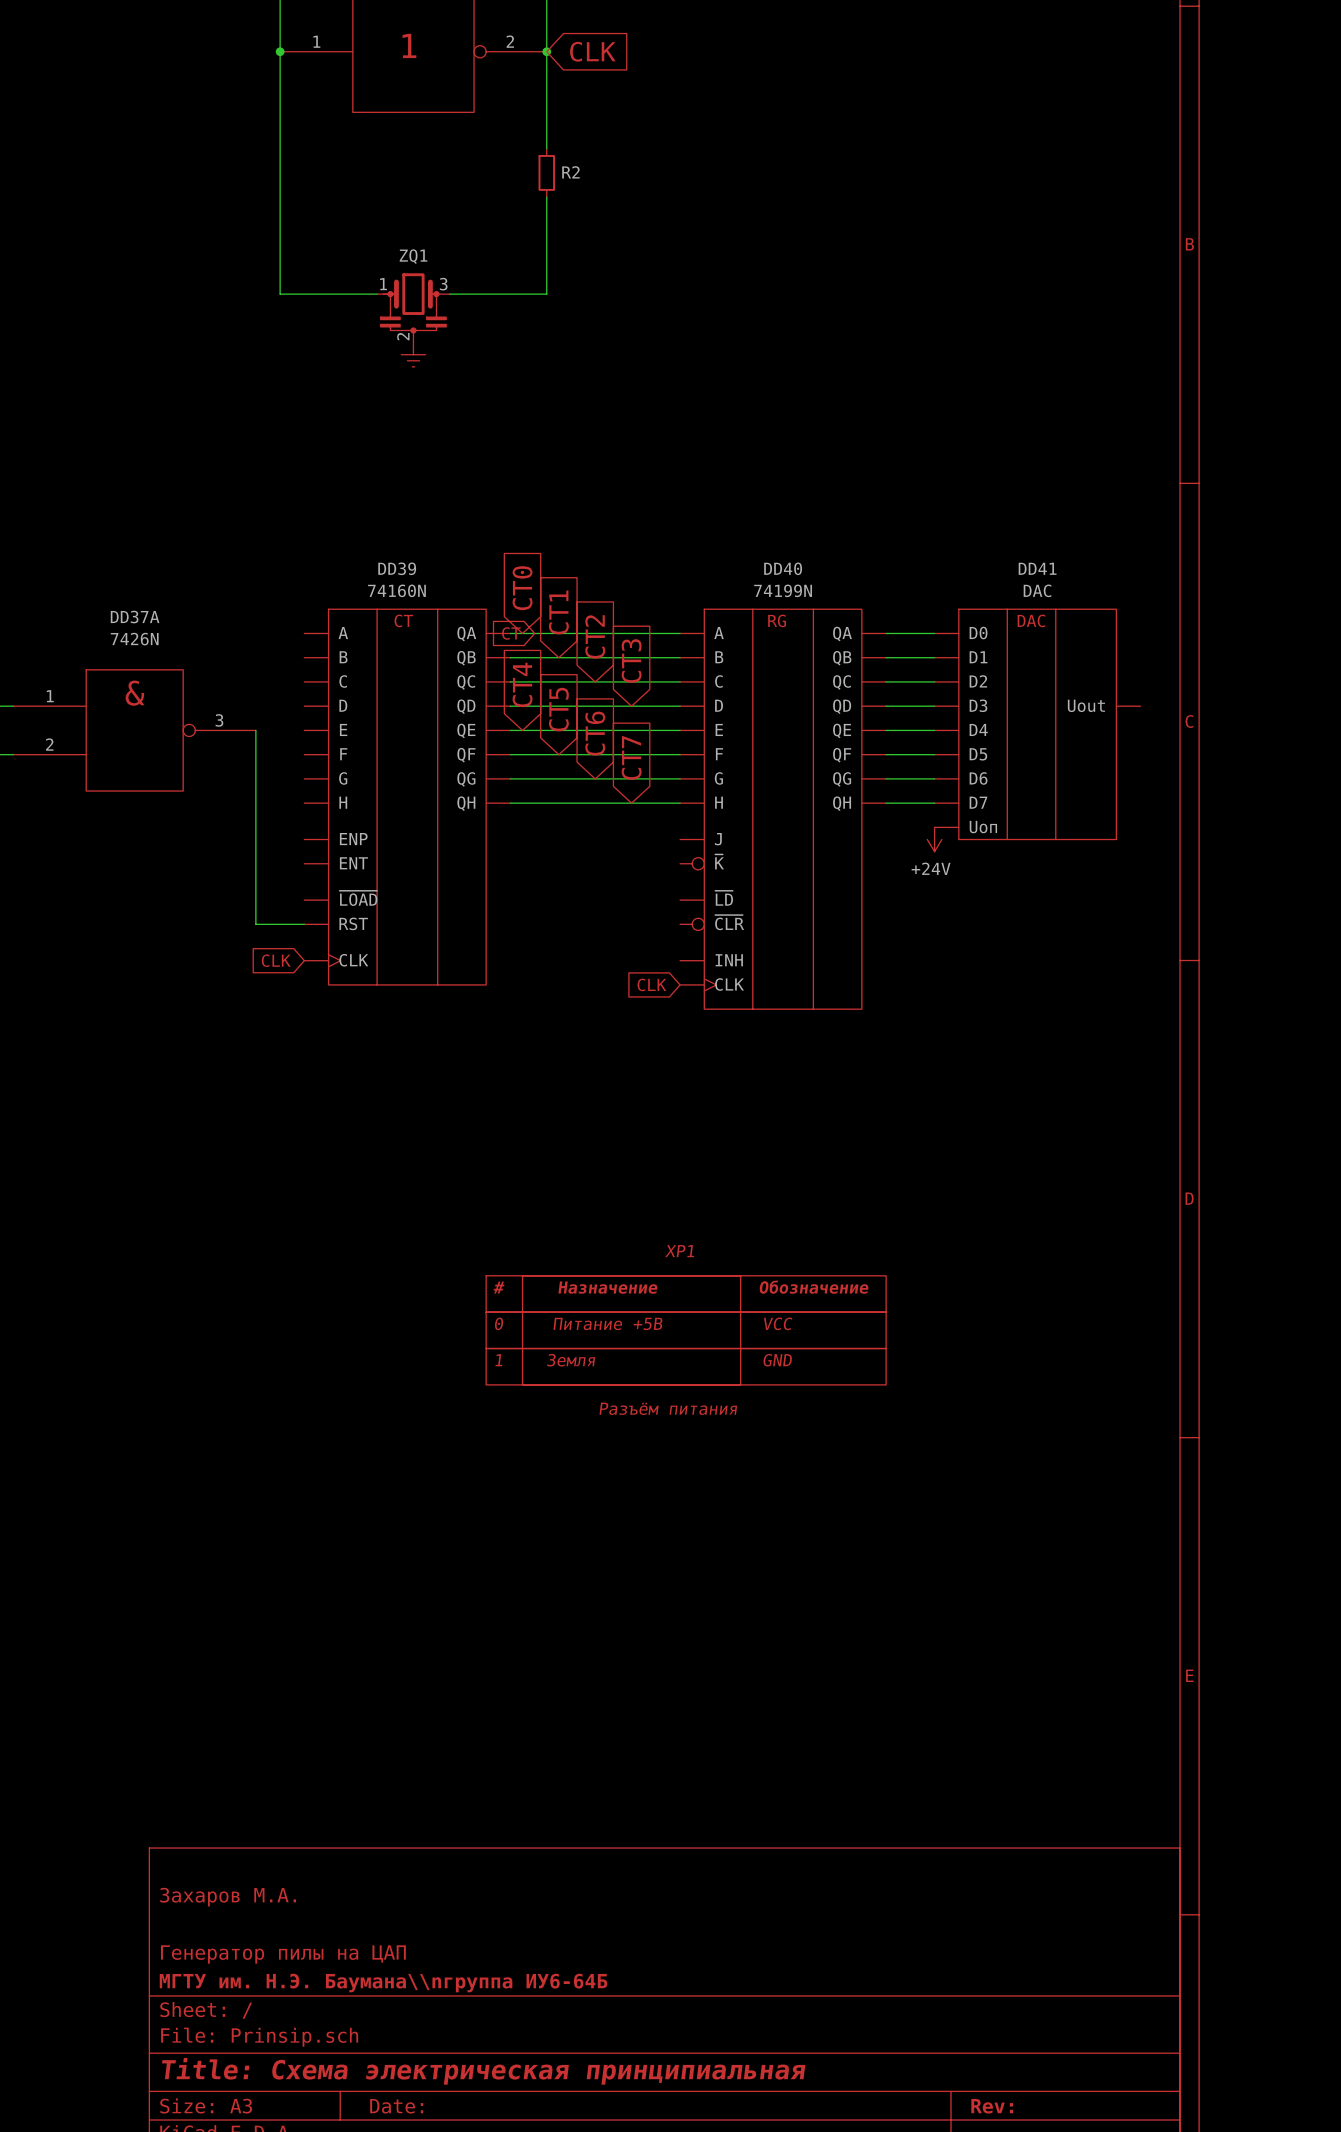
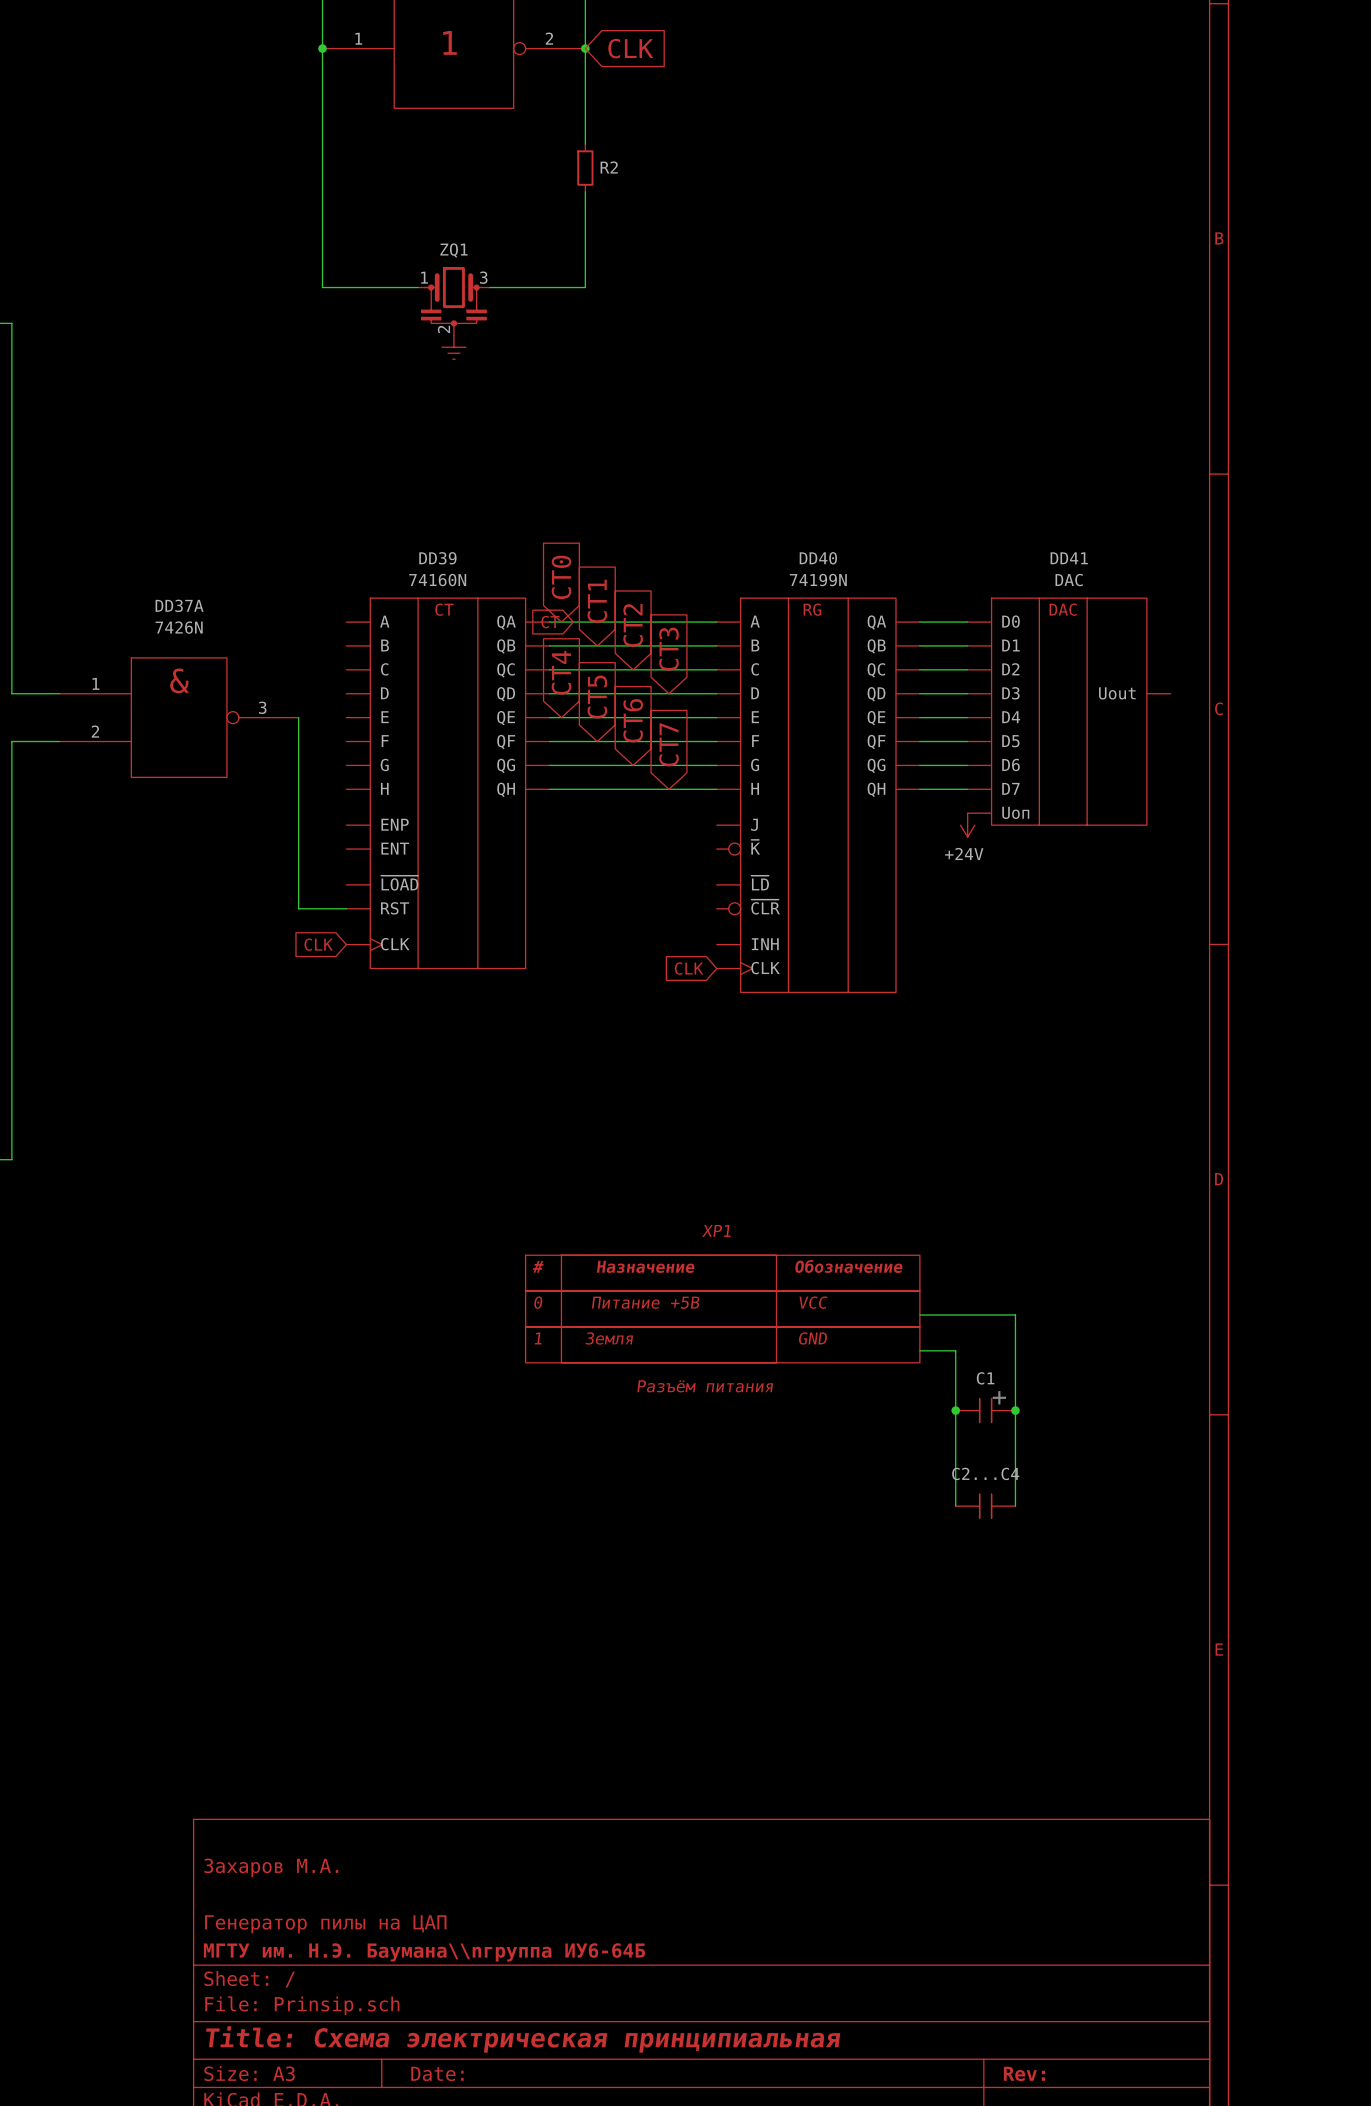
wire: none -> (919, 1315) (1015, 1315) (1015, 1506)
wire: none -> (919, 1350) (955, 1350) (955, 1506)
text: none -> + (999, 1397)
junction: none -> (955, 1410)
C1: none -> (985, 1410)
junction: none -> (1015, 1410)
C2...C4: none -> (985, 1506)

